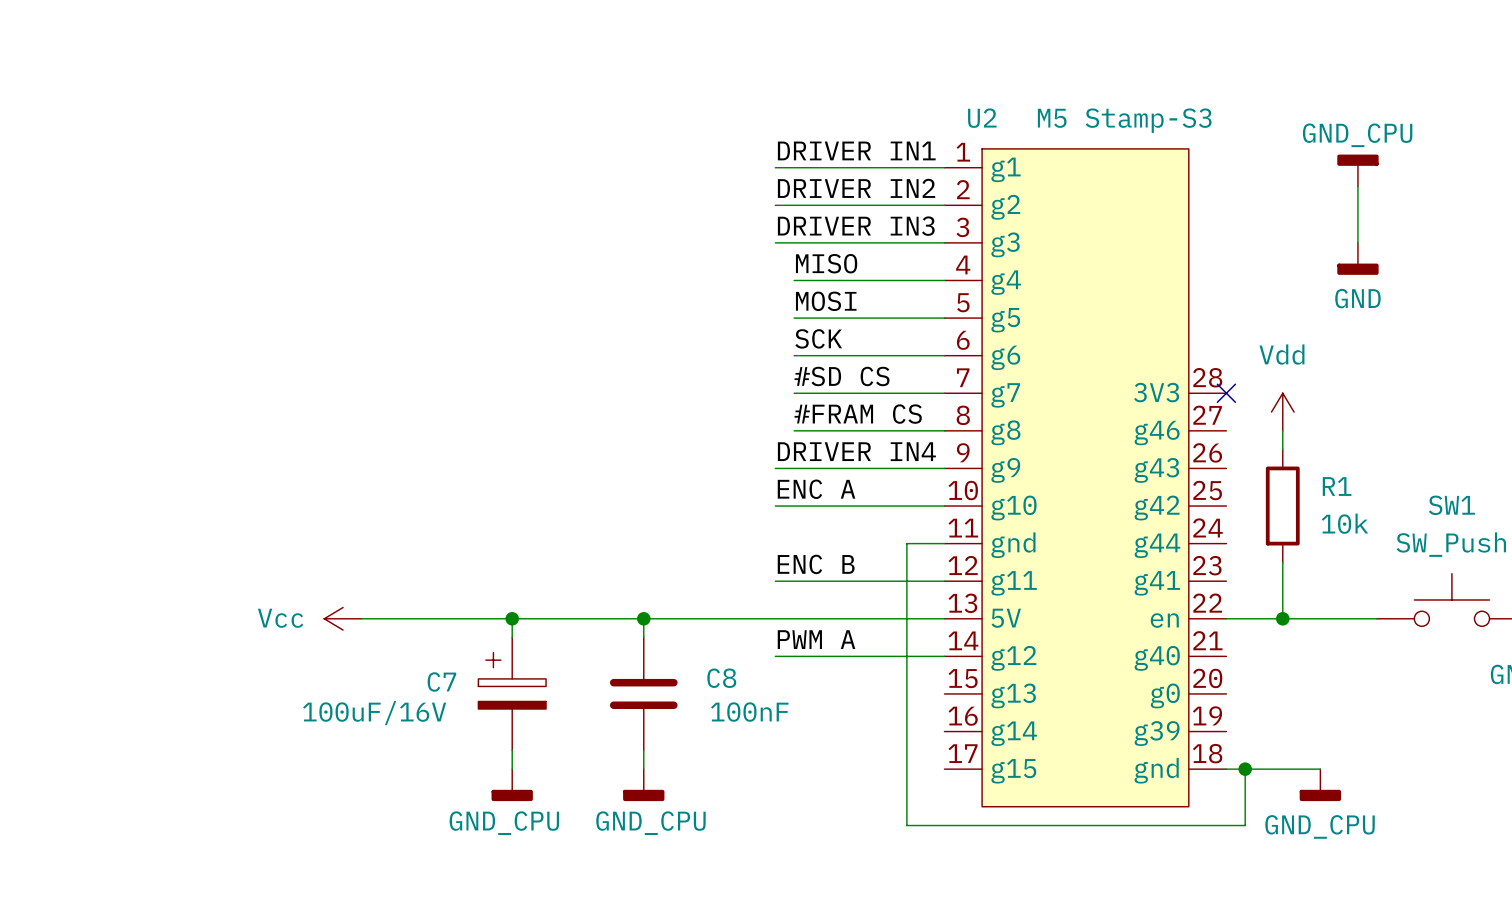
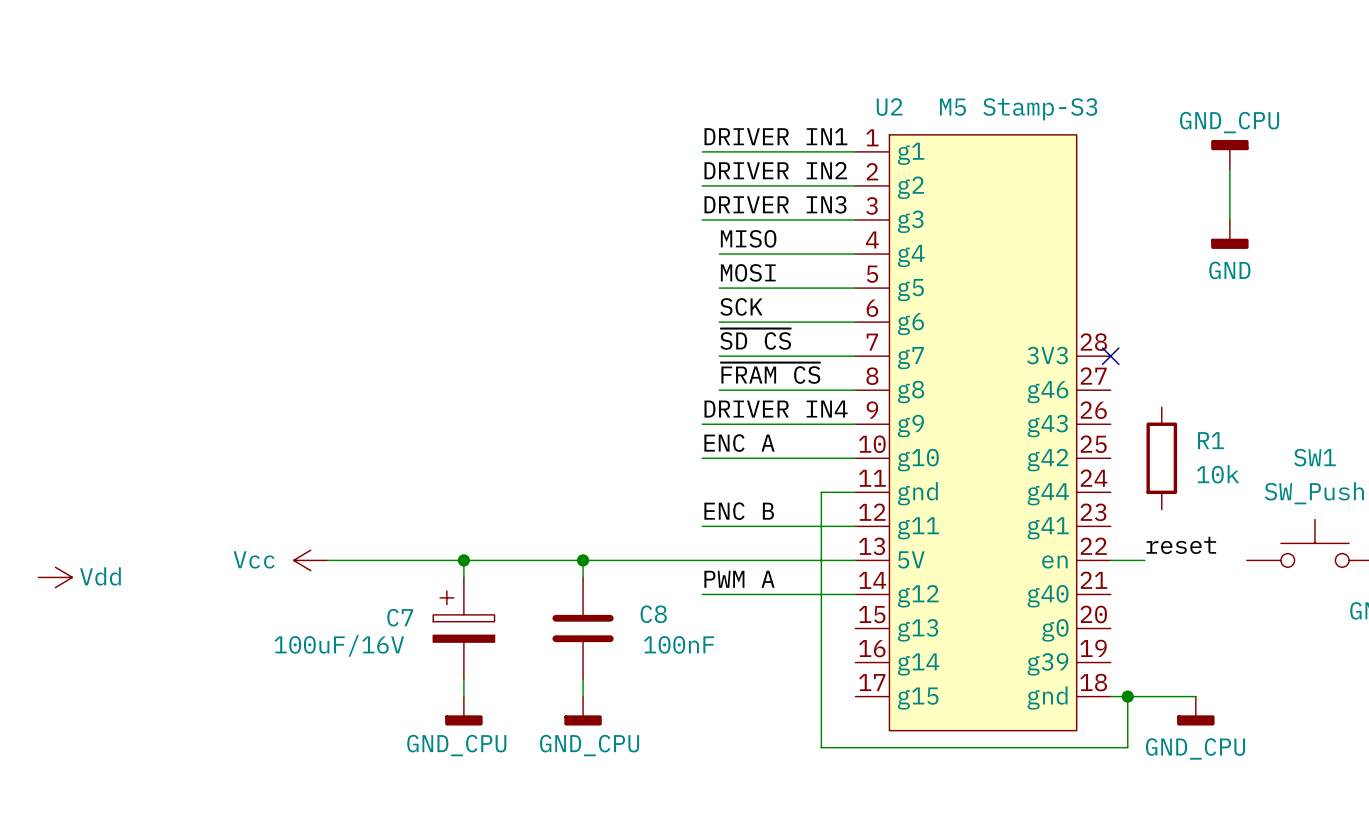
label: #SD CS (842, 376) -> ~{SD CS} (755, 339)
power symbol: Vdd (1282, 412) -> none
label: #FRAM CS (858, 414) -> ~{FRAM CS} (770, 373)
wire: (1282, 430) (1282, 449) -> none
wire: (1282, 562) (1282, 618) -> none
label: none -> reset (1181, 545)
wire: (1263, 618) (1376, 618) -> none
junction: (1282, 618) -> none
power symbol: none -> Vdd (55, 577)

